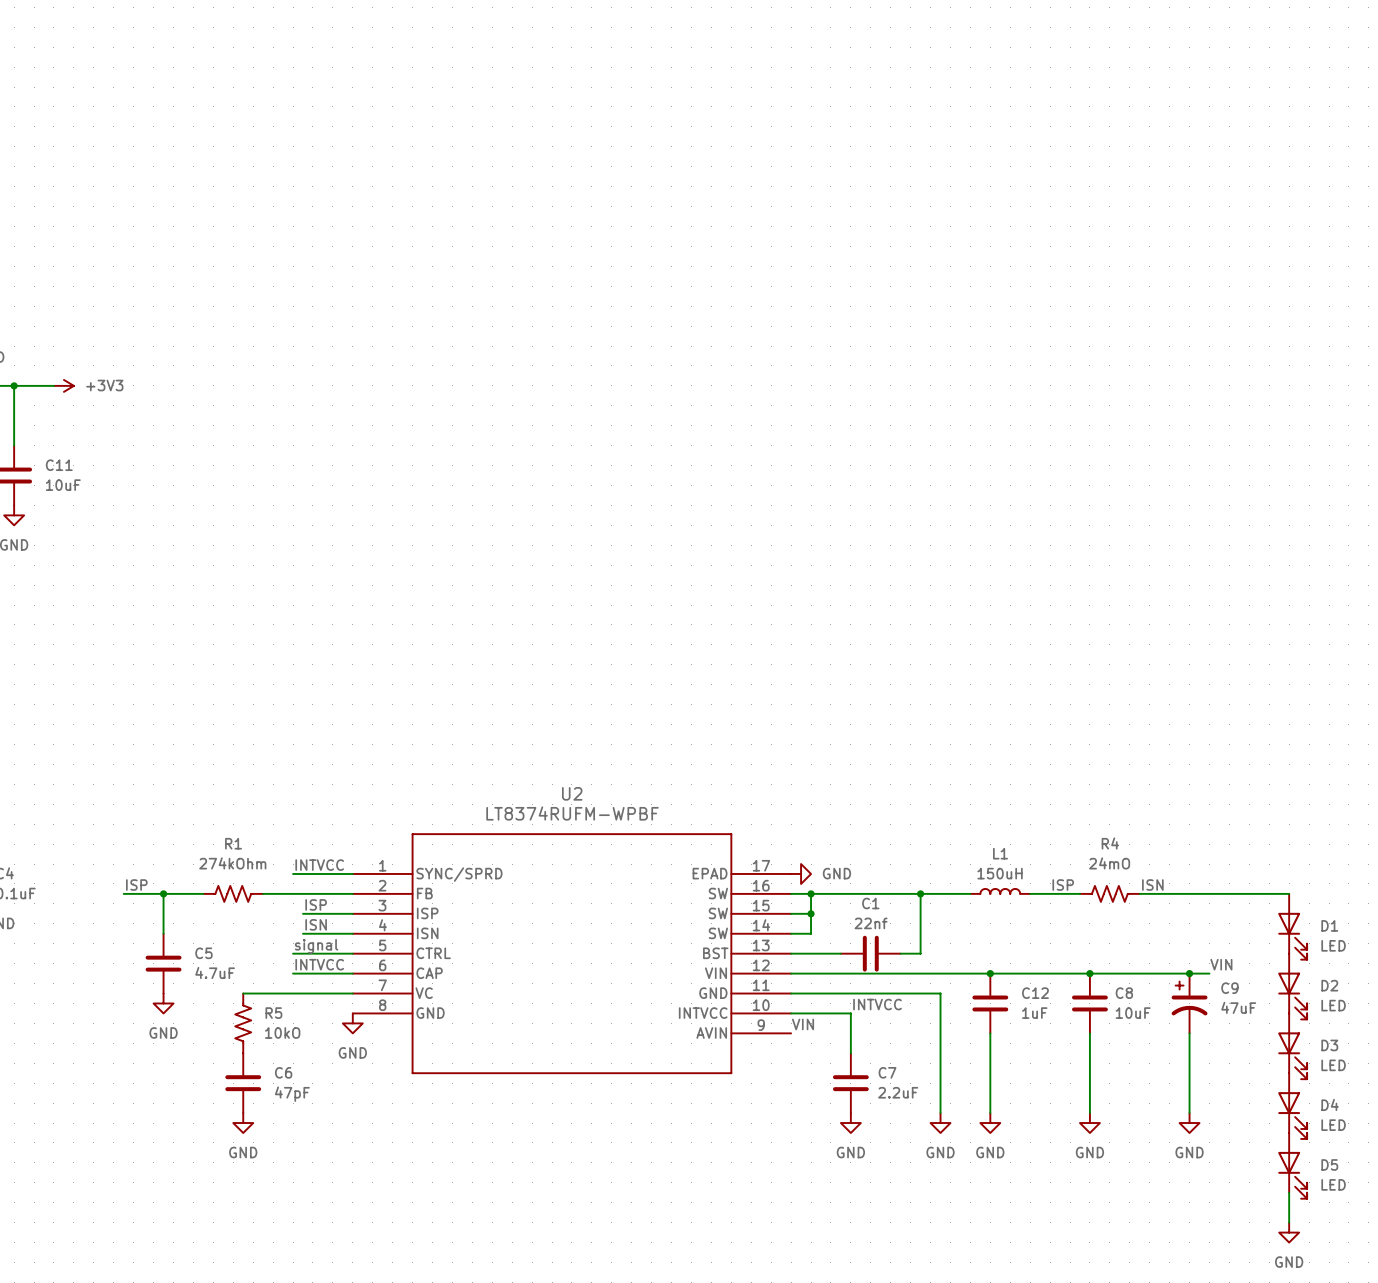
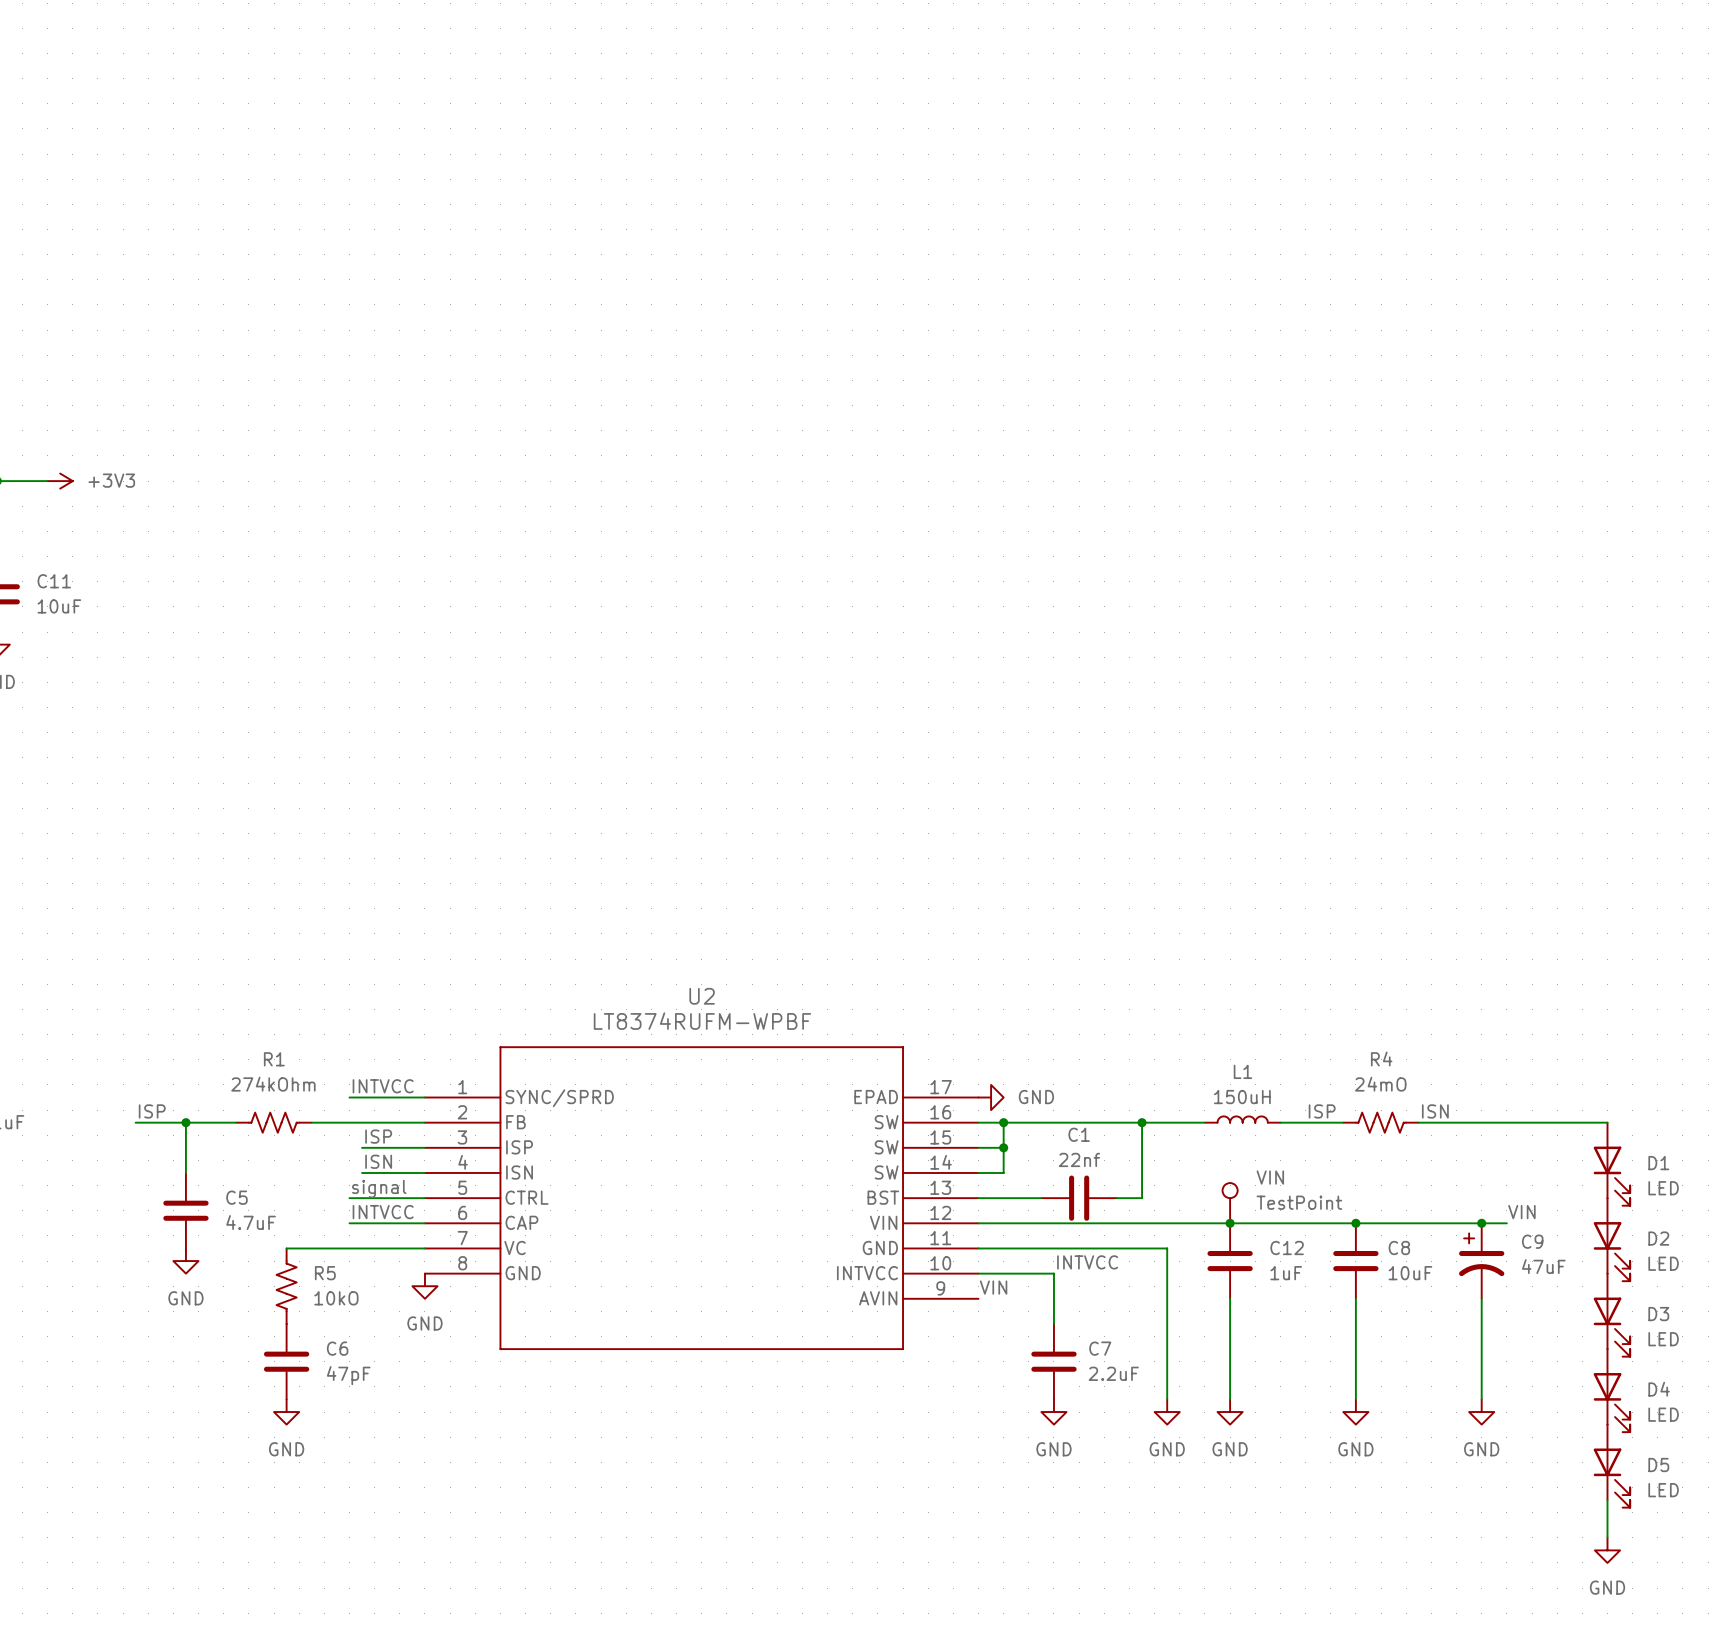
VIN: none -> TestPoint (1230, 1203)

